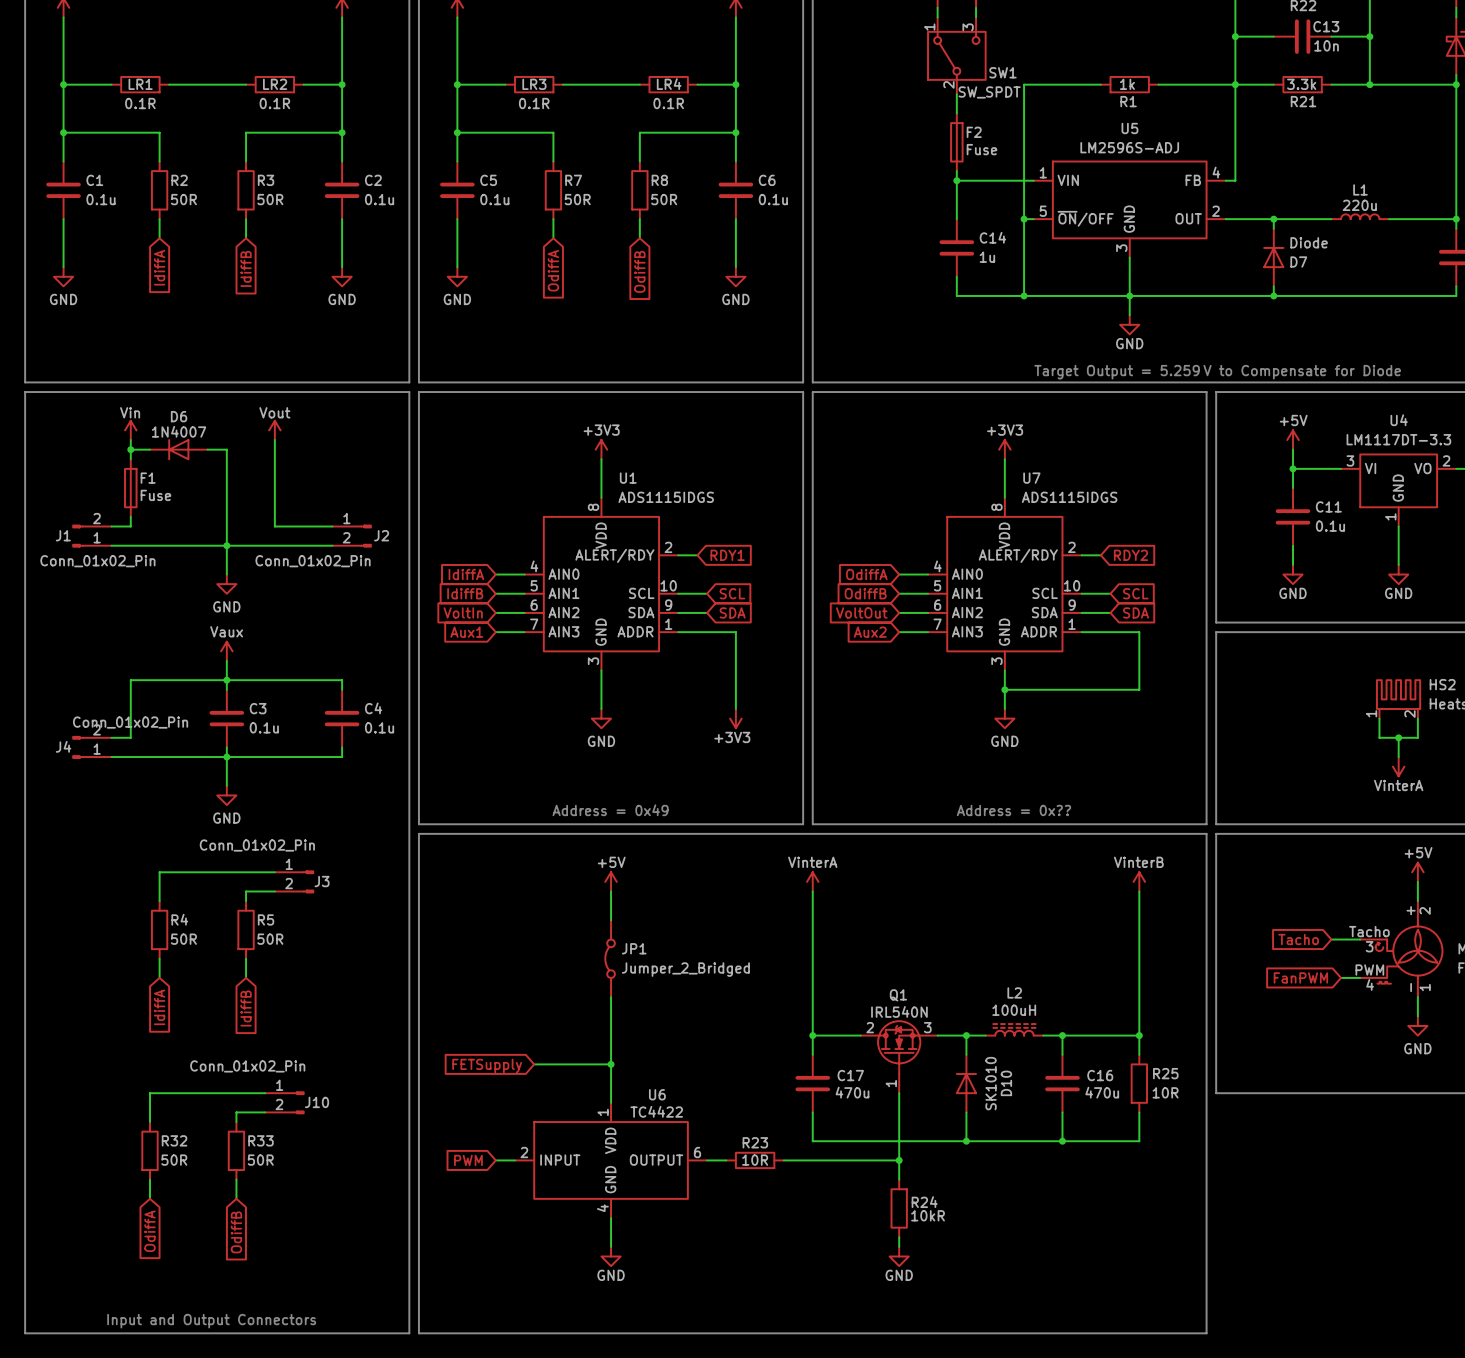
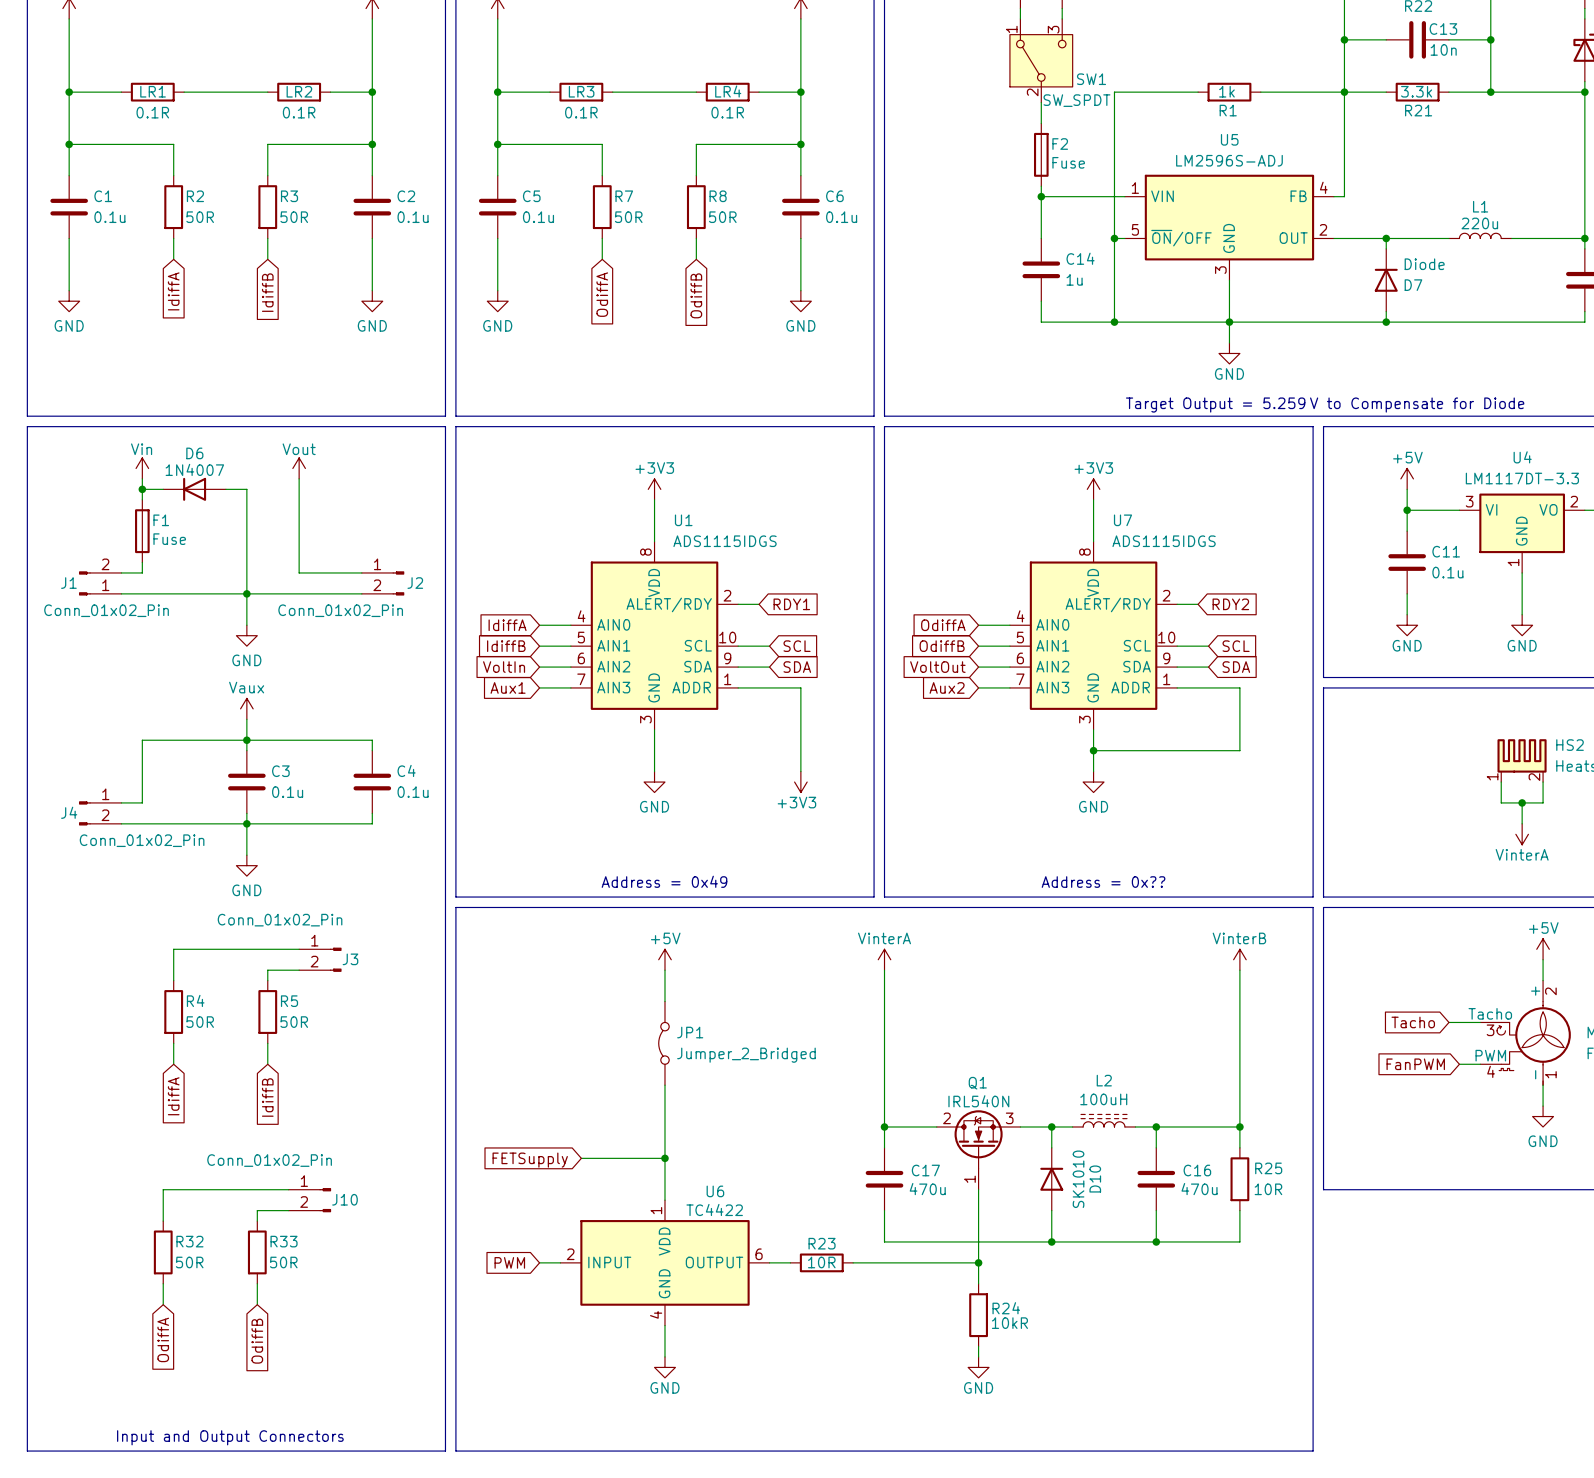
J4 flip: as is (77, 747) -> up-down (84, 813)

